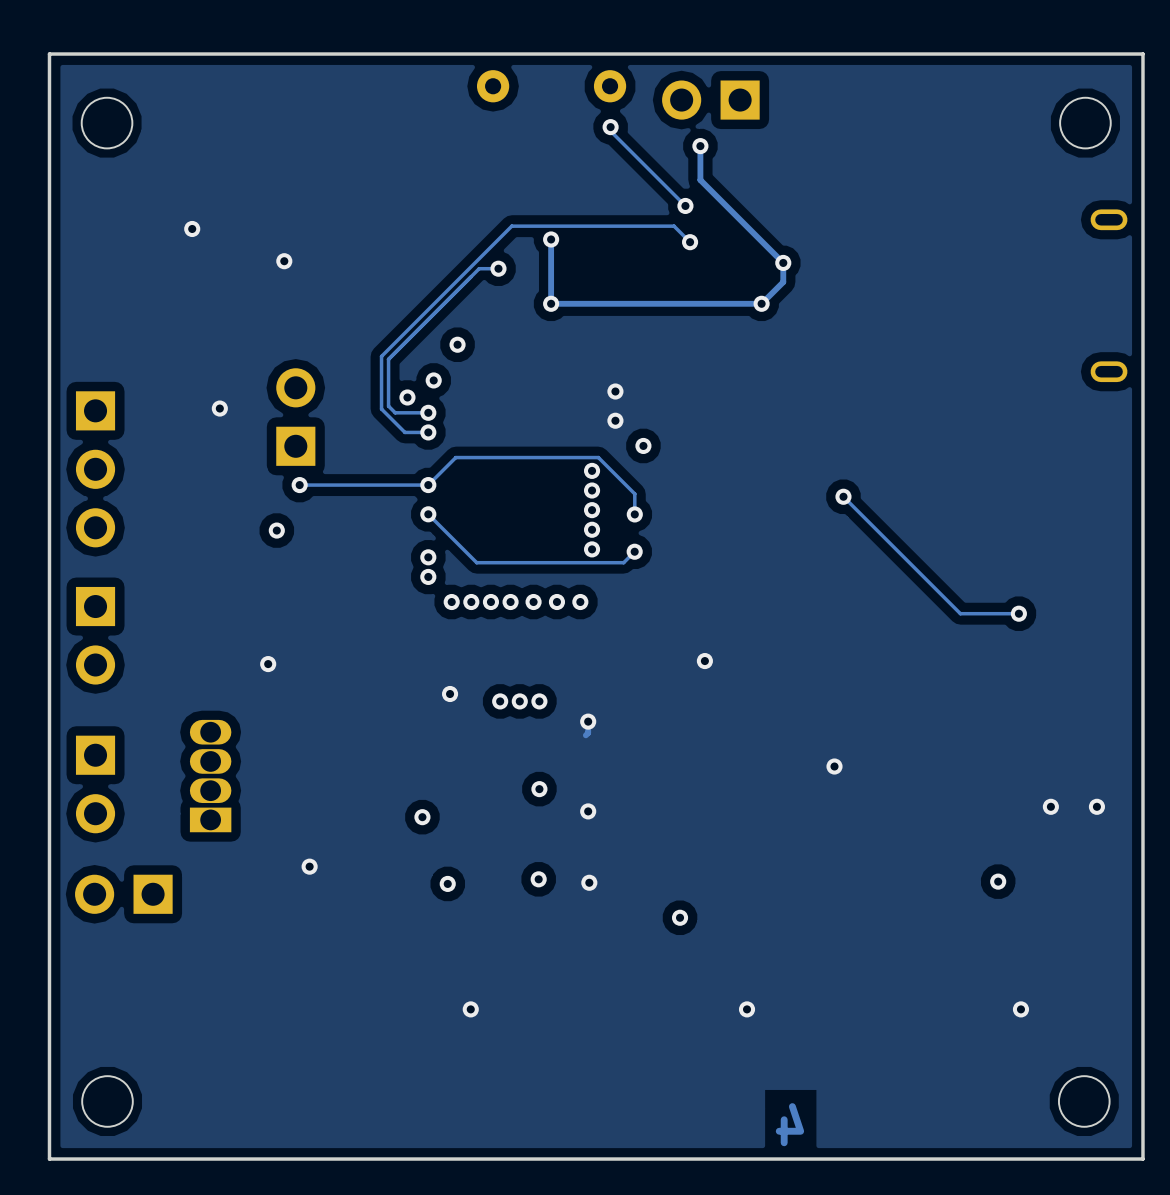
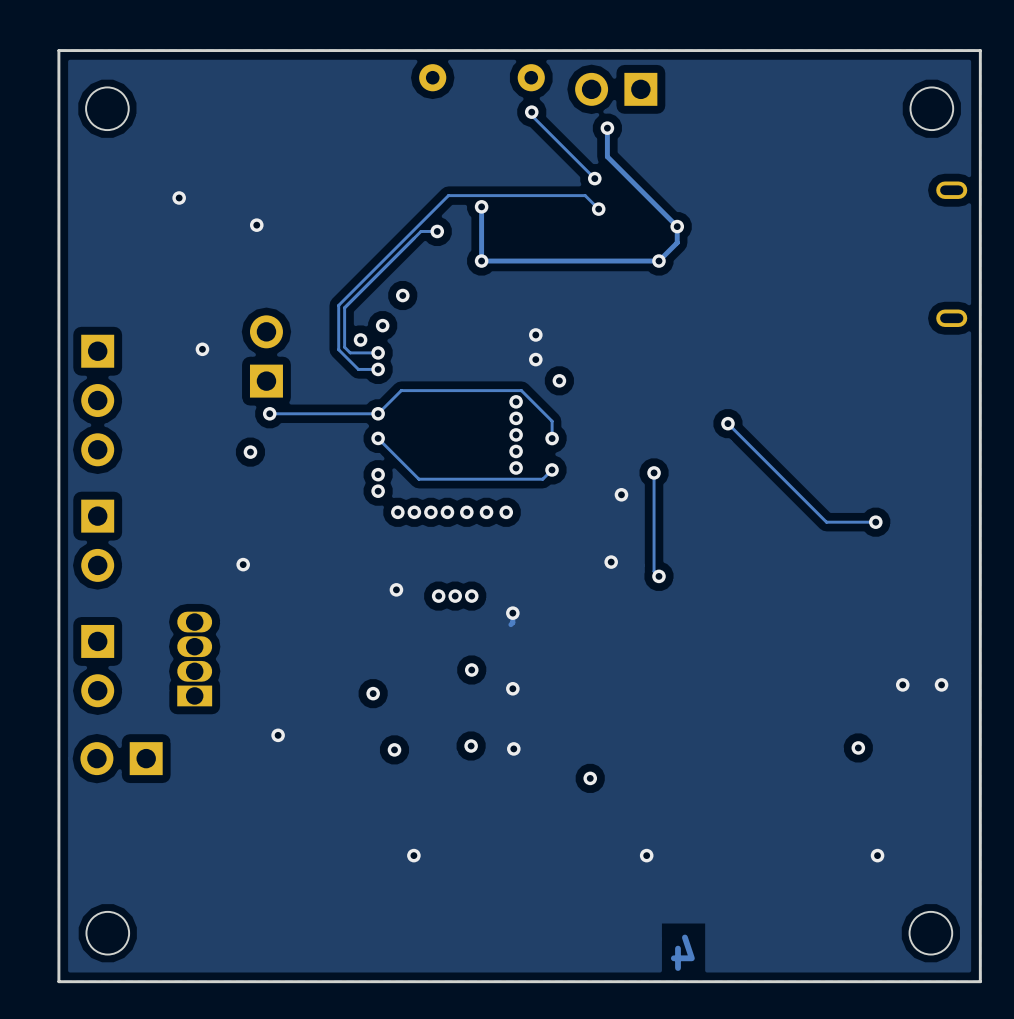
track: none -> (654, 472) (654, 571) (658, 576)
via: none -> (654, 472)
via: none -> (621, 494)
via: none -> (658, 576)
via: (834, 766) -> none

